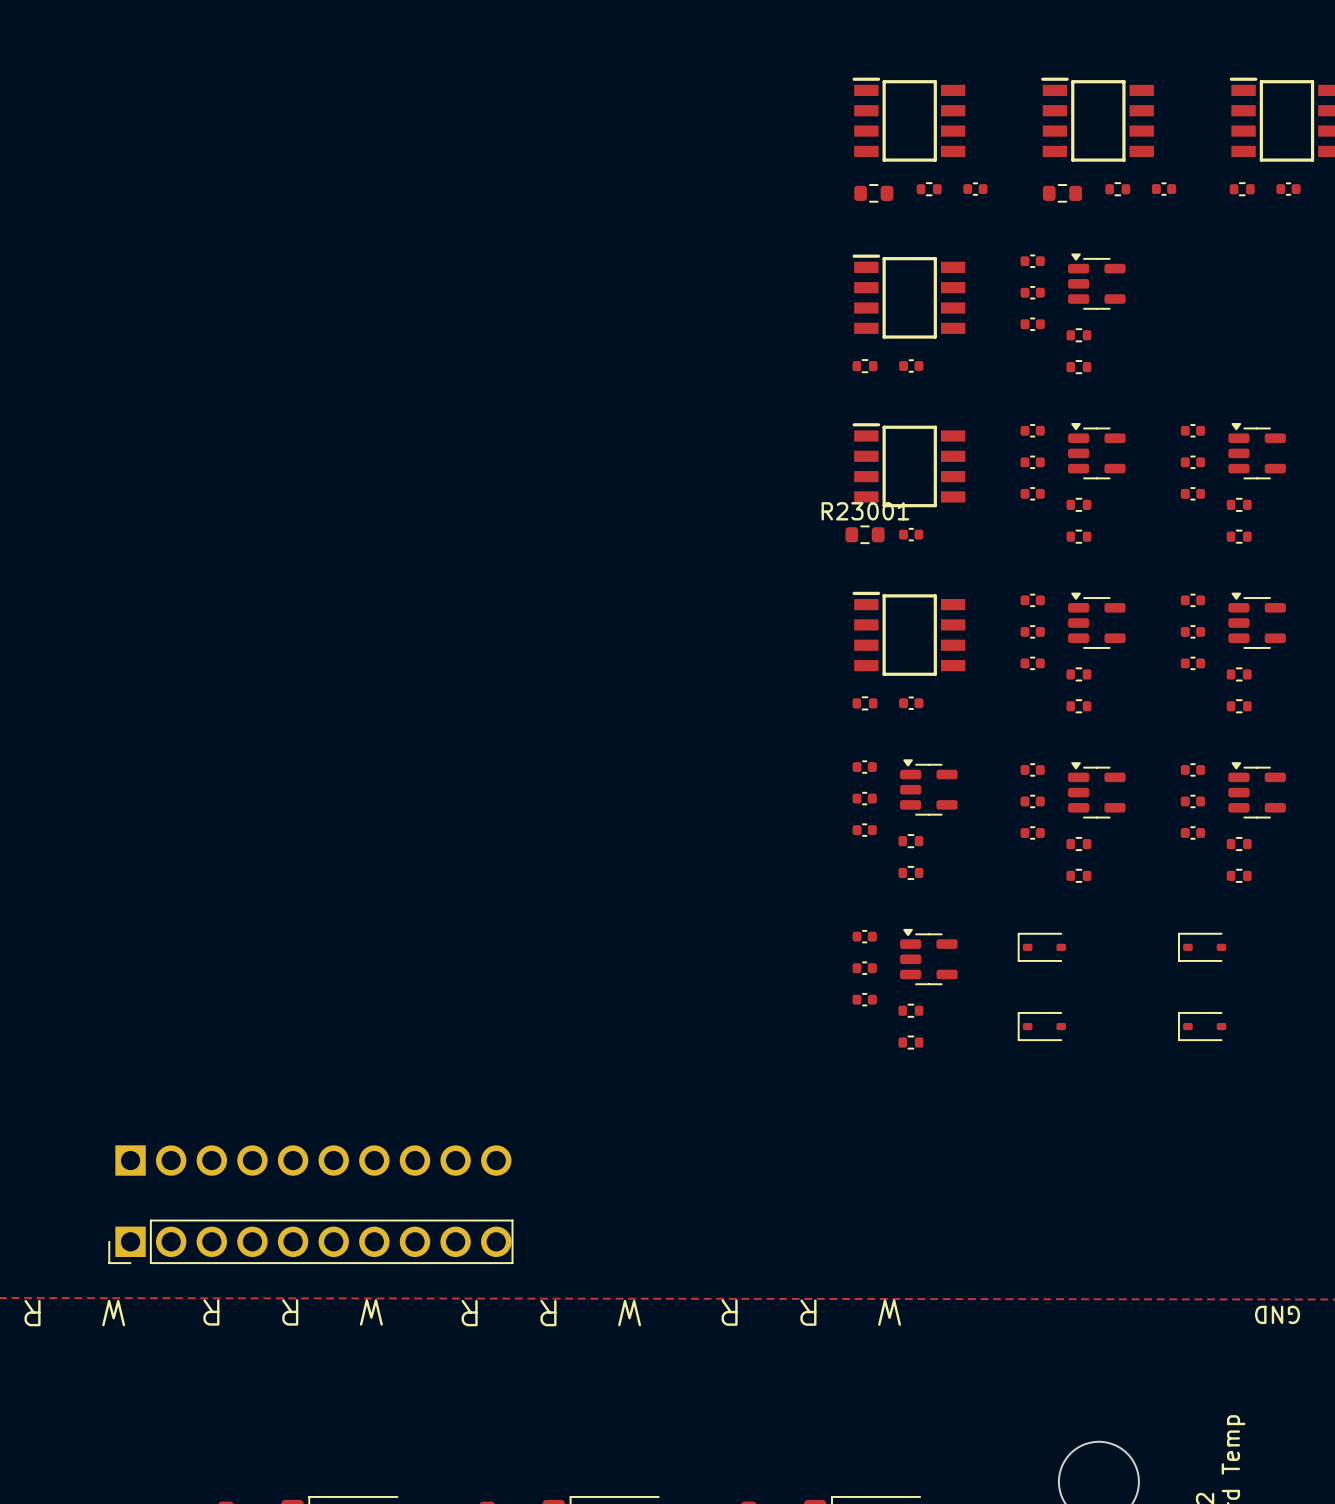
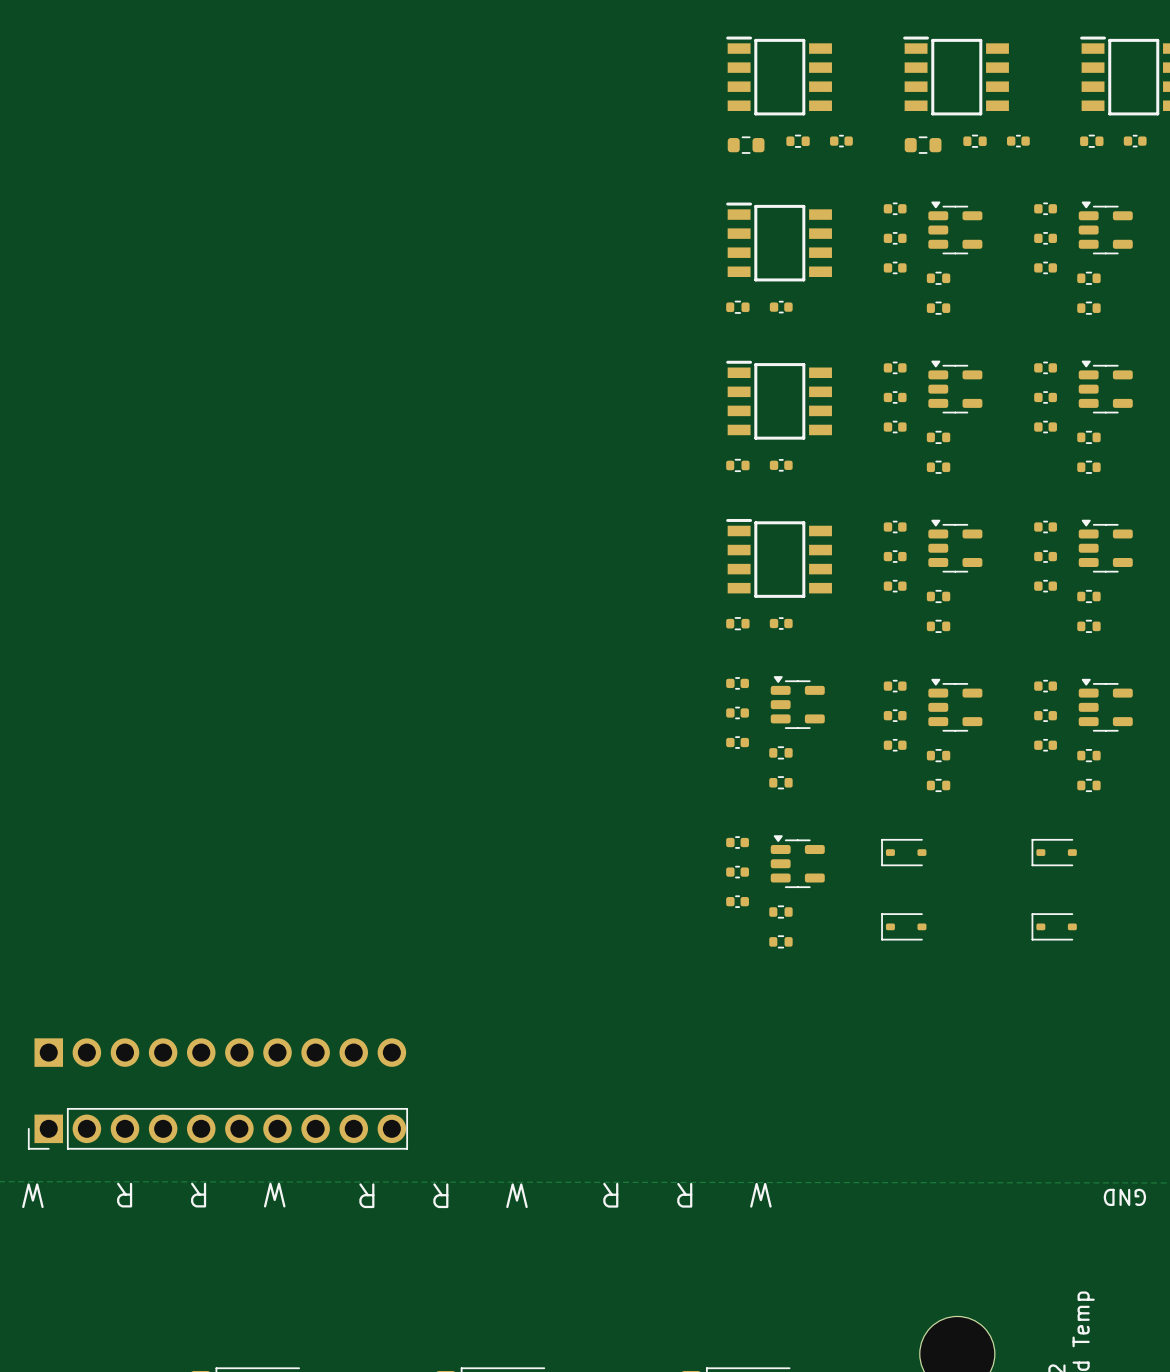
part: none -> (1045, 208)
part: none -> (1105, 227)
part: none -> (1045, 238)
part: none -> (1045, 267)
part: none -> (1088, 278)
part: none -> (1088, 308)
R23001: (865, 534) -> none
part: none -> (737, 465)

